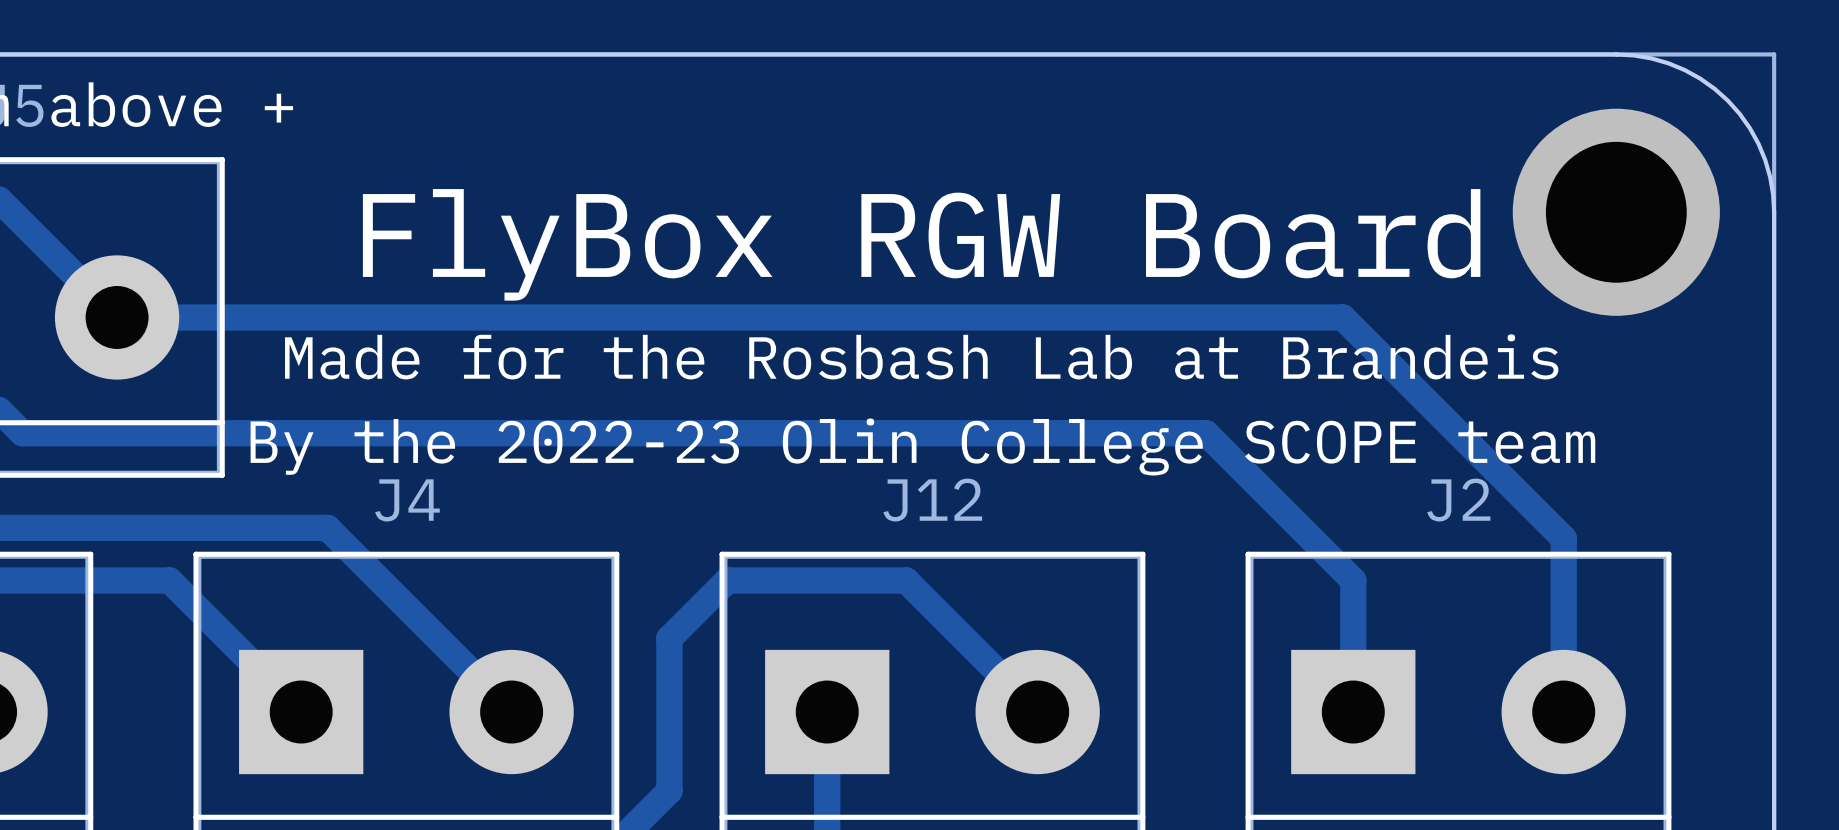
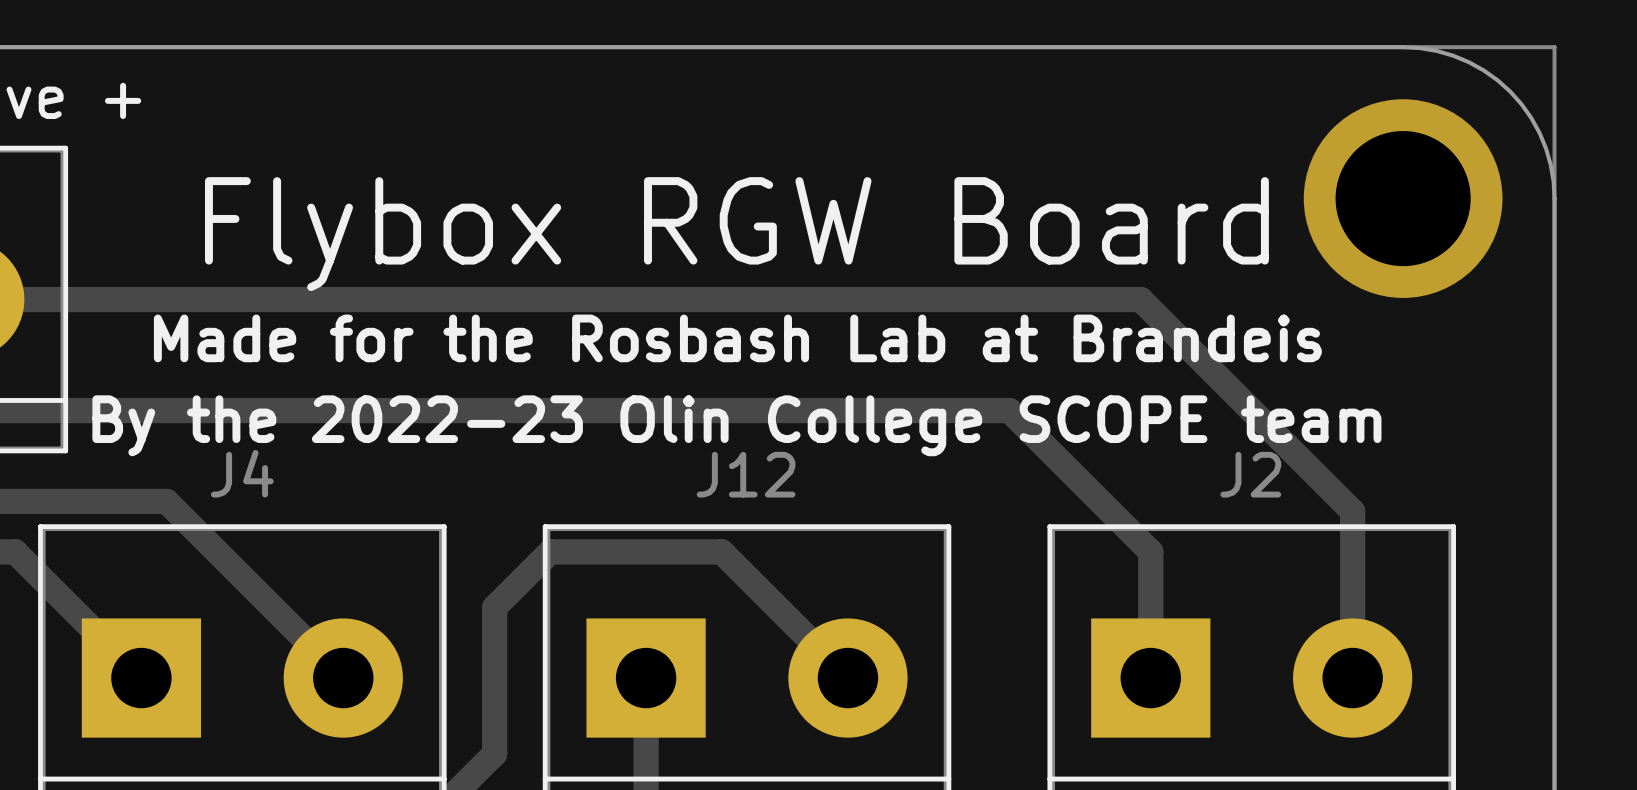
text: FlyBox RGW Board (921, 244) -> Flybox RGW Board (736, 234)

